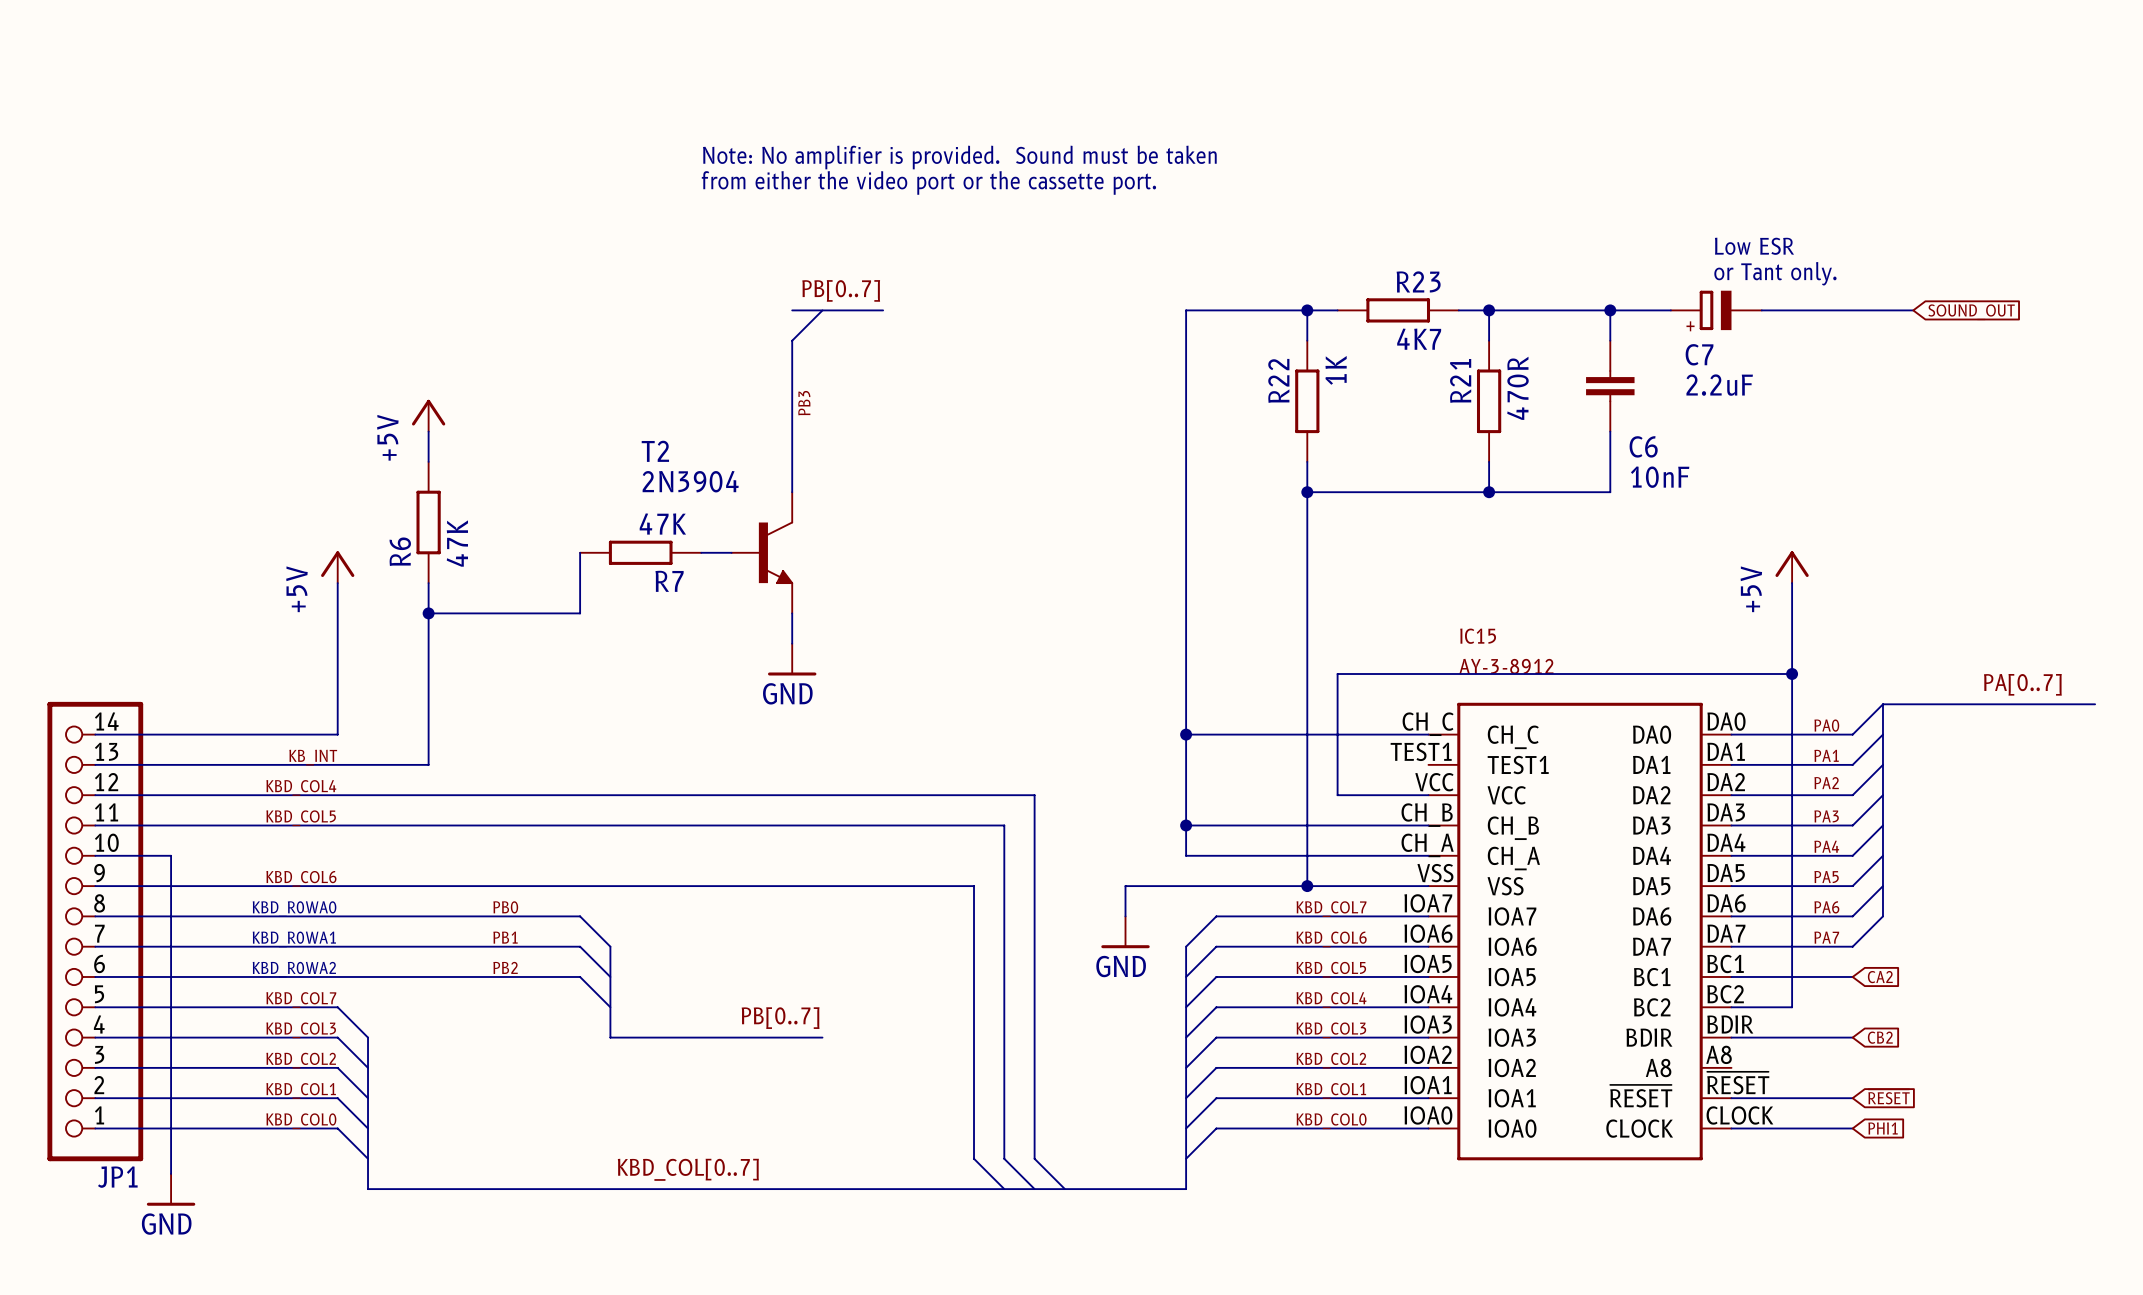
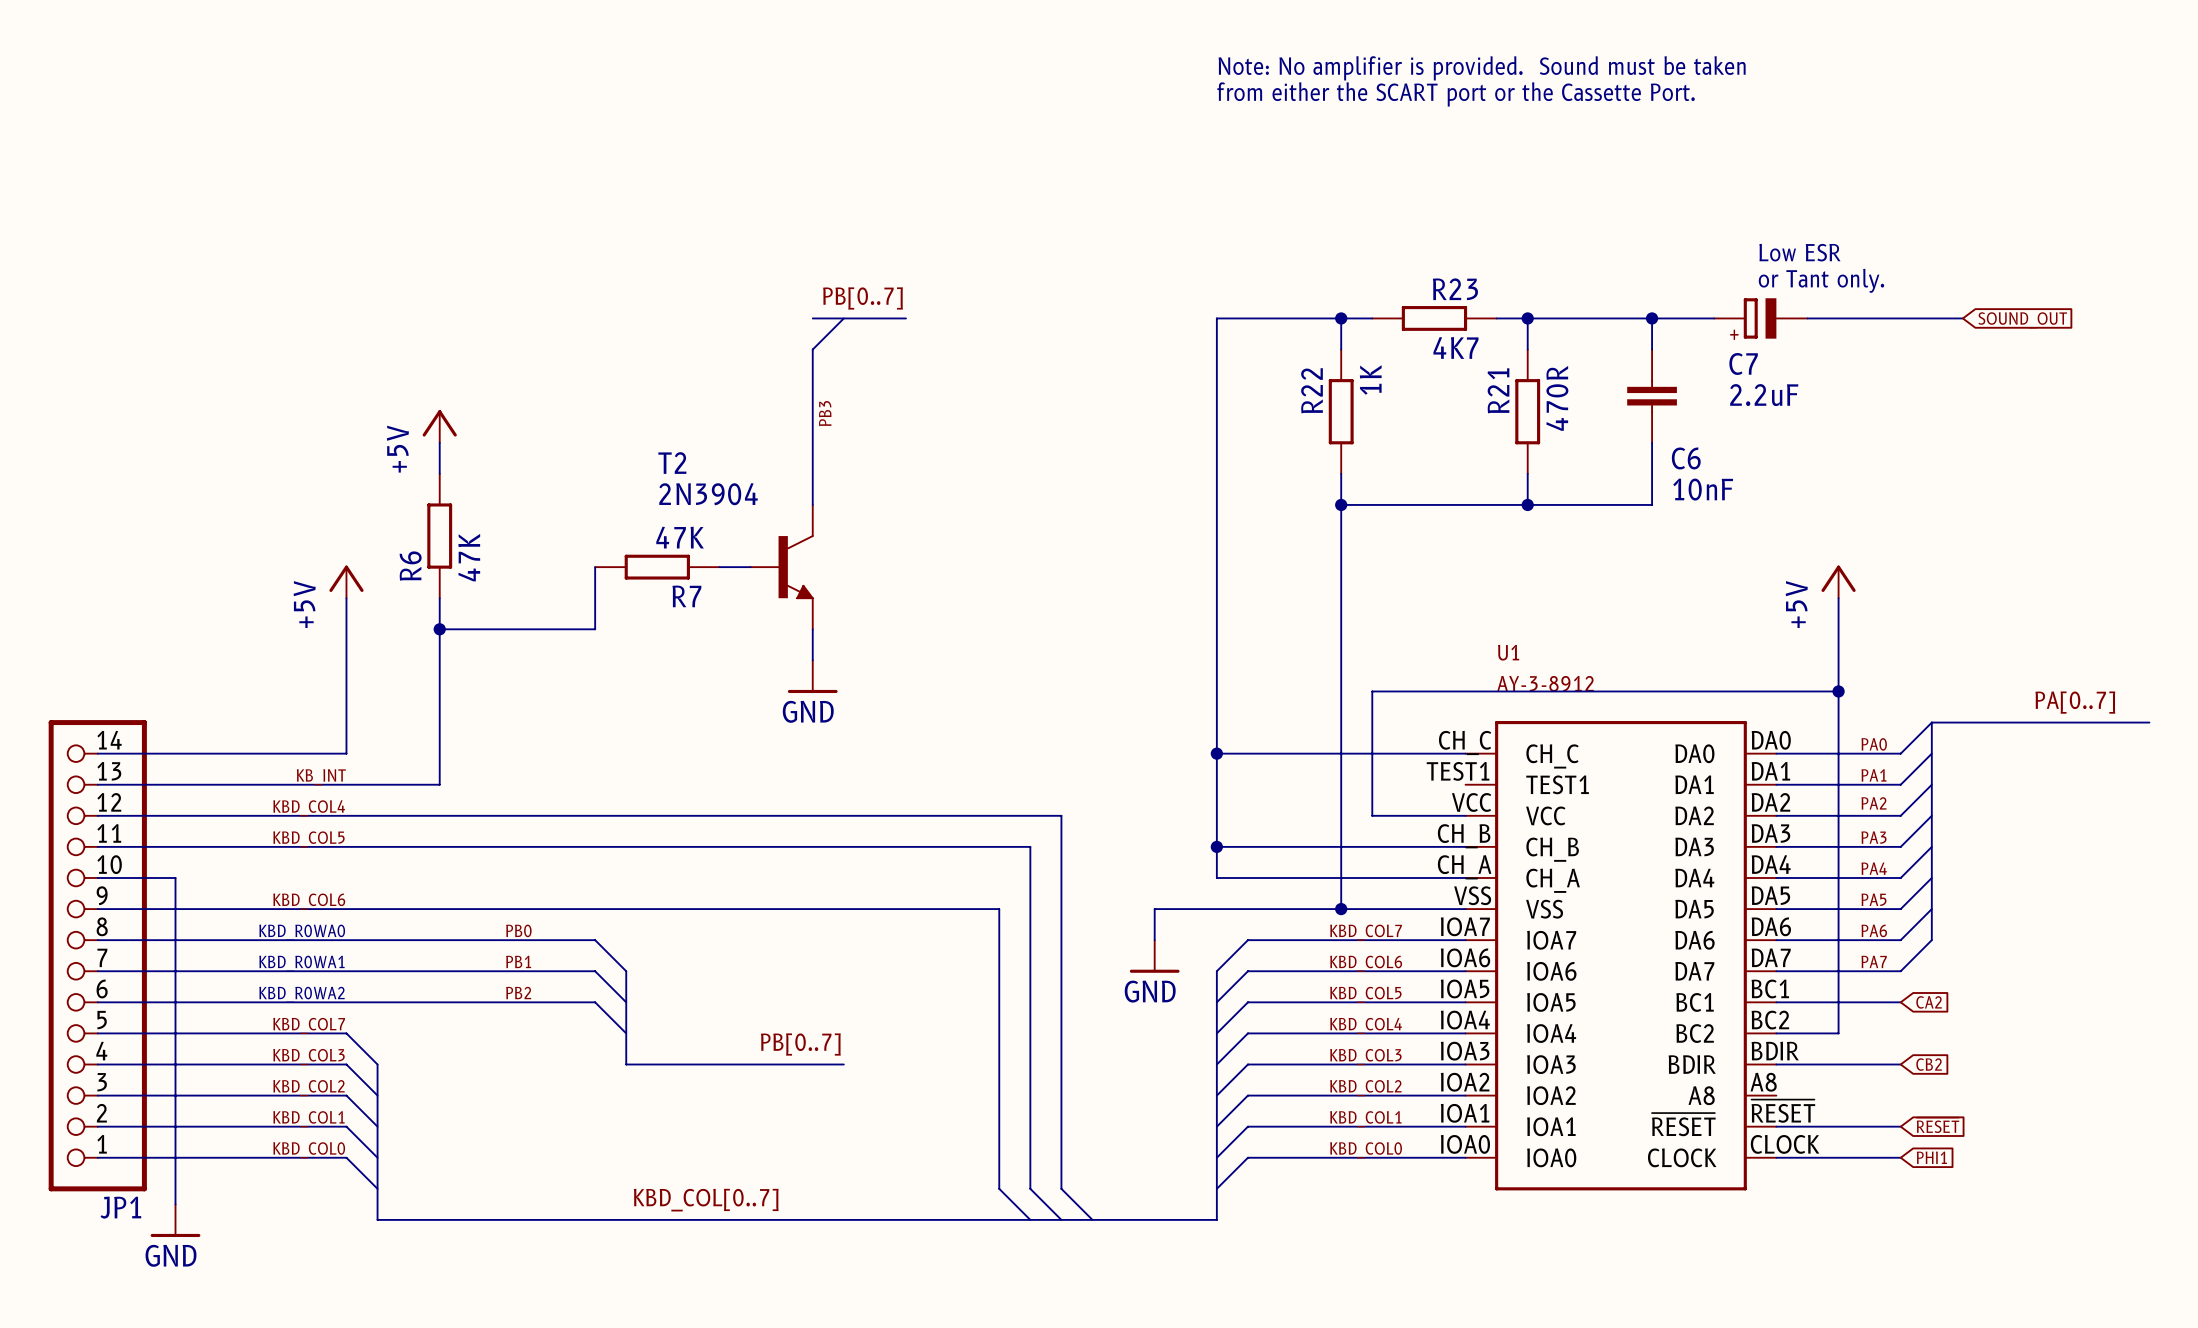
text: none -> Note: No amplifier is provided. Sound must be taken (1482, 68)
text: none -> from either the SCART port or the Cassette Port. (1456, 94)
text: Note: No amplifier is provided. Sound must be taken (959, 157) -> none
text: from either the video port or the cassette port. (928, 182) -> none
IC15 name: IC15 (1478, 636) -> U1 (1508, 652)

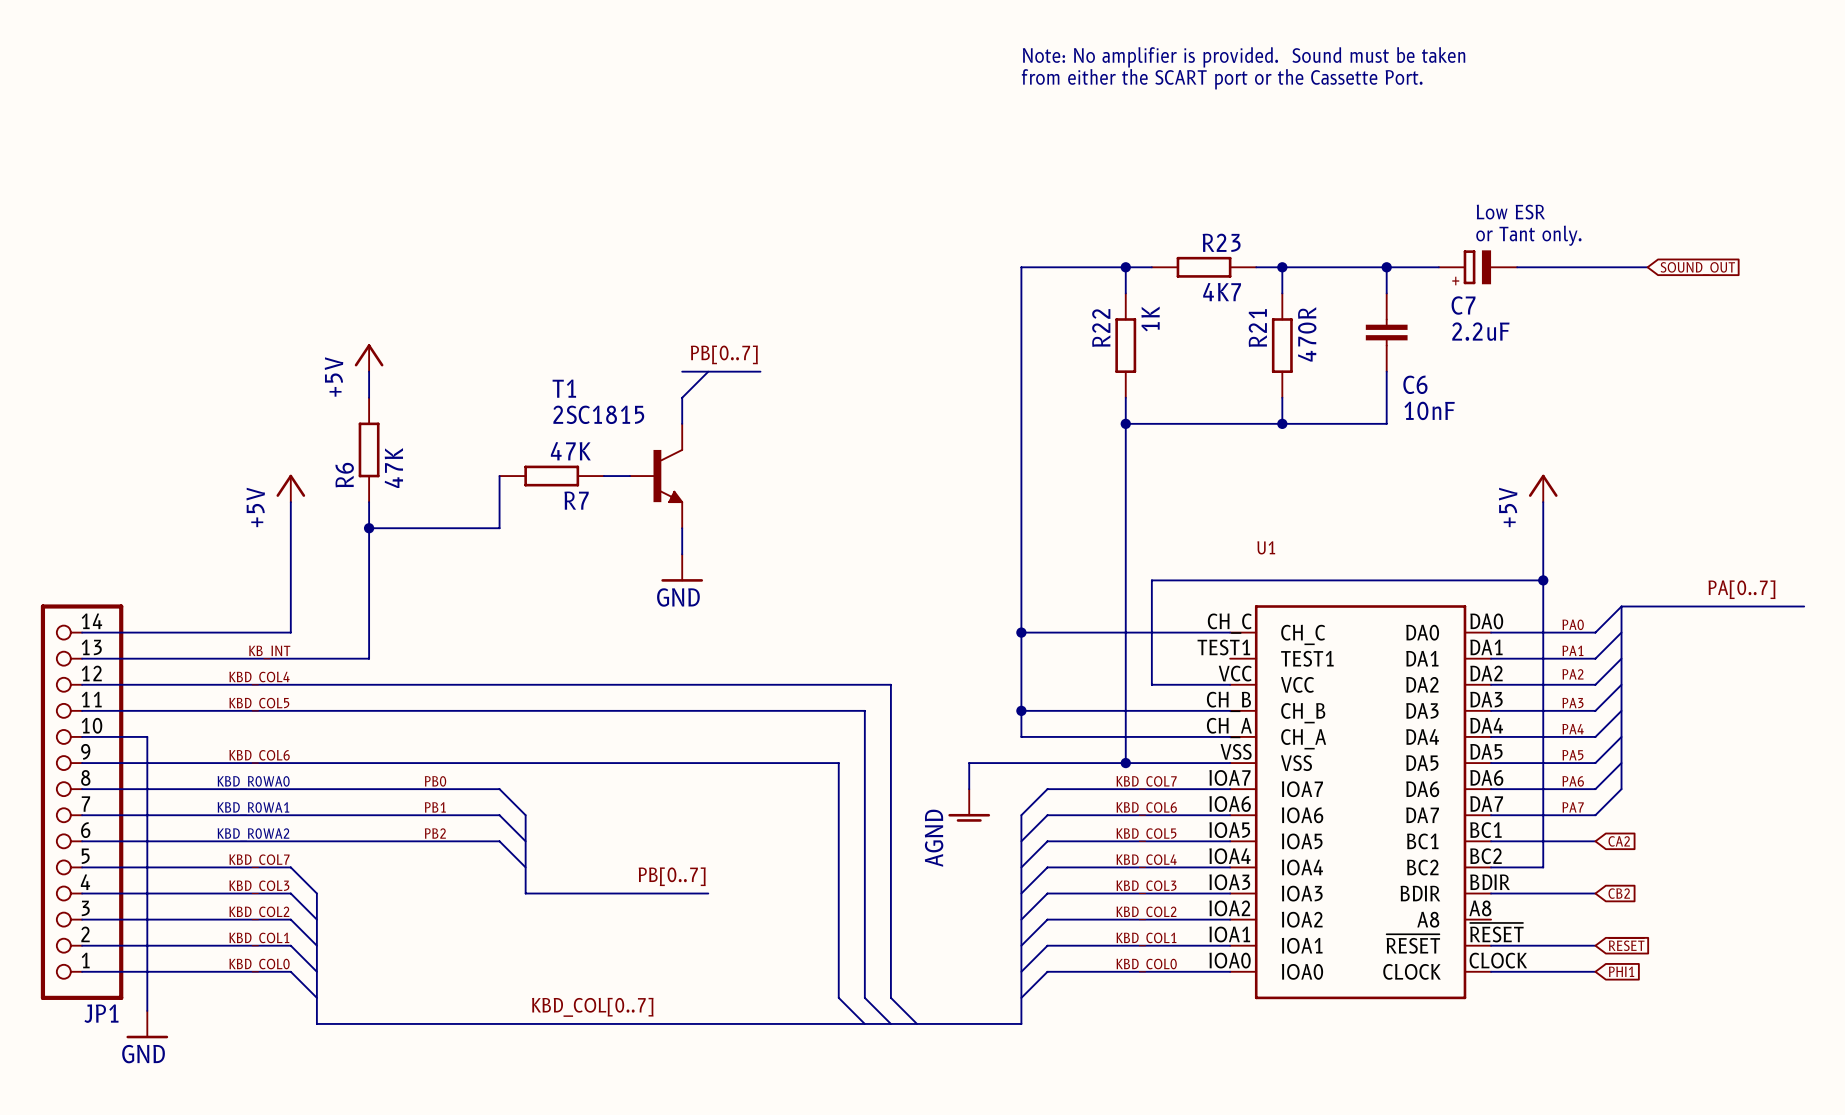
label position: PB[0..7] (863, 298) -> PB[0..7] (724, 354)
bus: (812, 318) (906, 318) -> (682, 371) (760, 371)
wire: (843, 318) (812, 349) (812, 473) -> (708, 371) (682, 397)
label: PB3 (825, 413) -> none
T2 name: T2 (672, 463) -> T1 (564, 388)
T2 value: 2N3904 (708, 494) -> 2SC1815 (598, 414)
U1 value: AY-3-8912 (1545, 683) -> none
power symbol: GND (1154, 956) -> AGND (969, 805)

